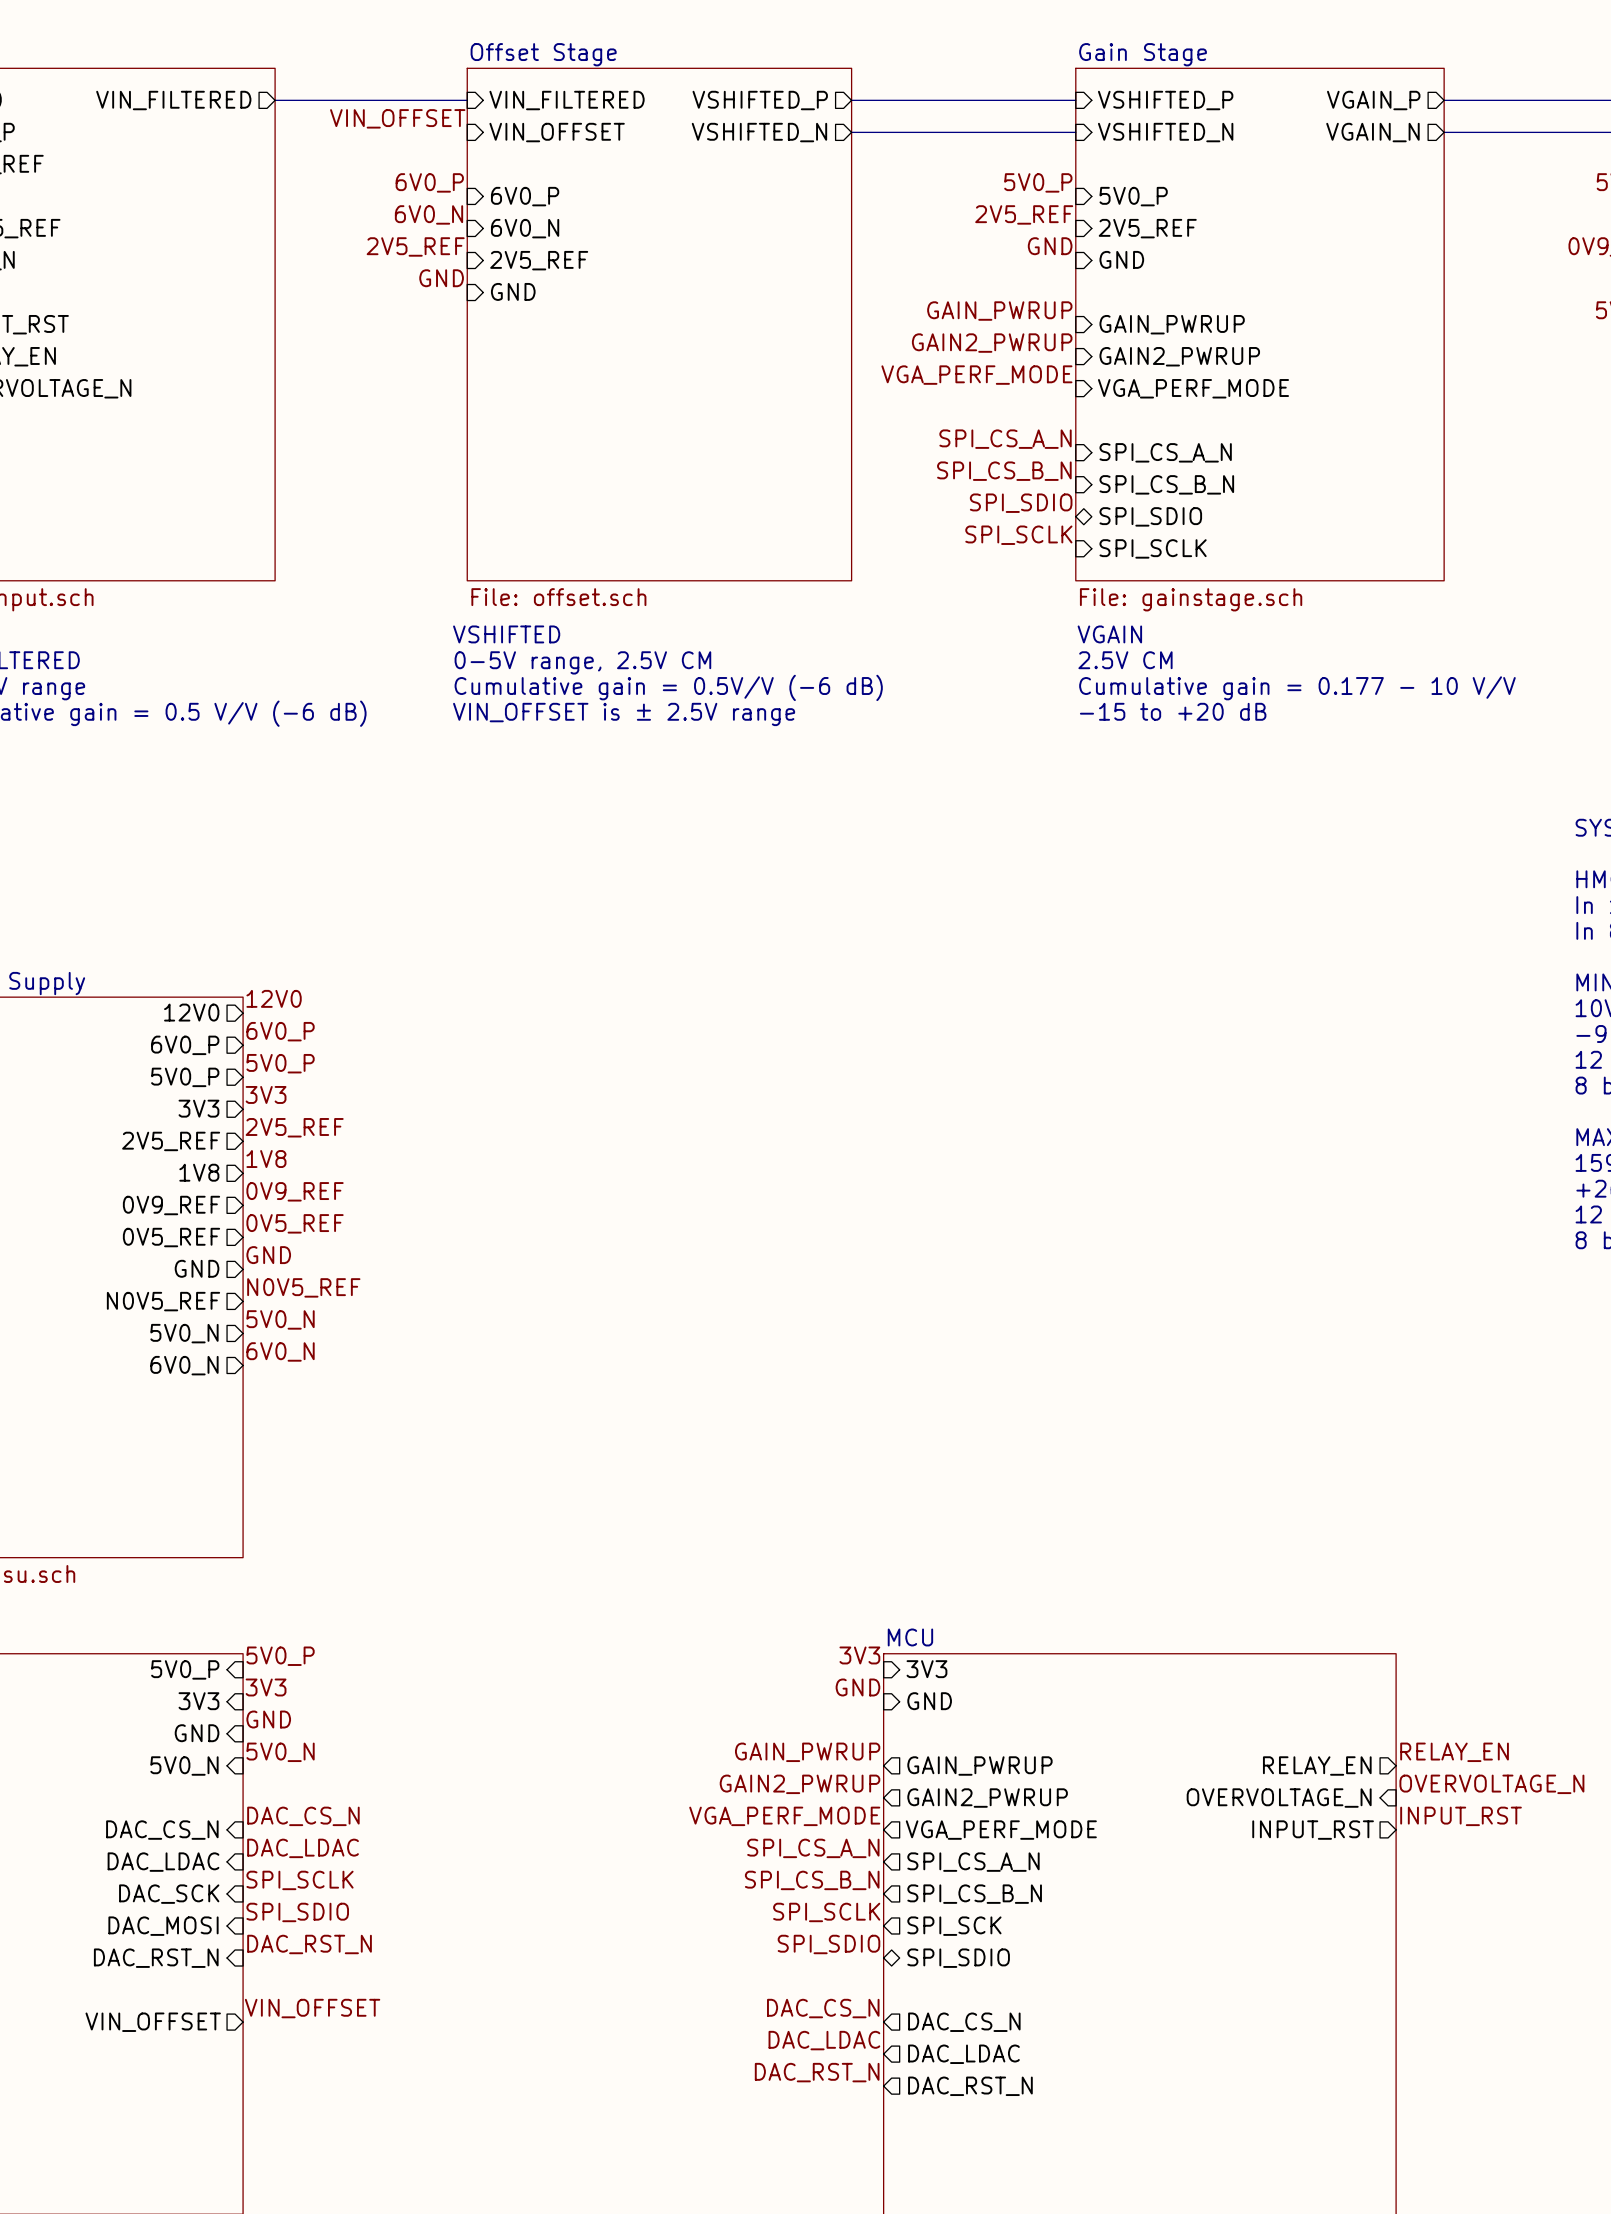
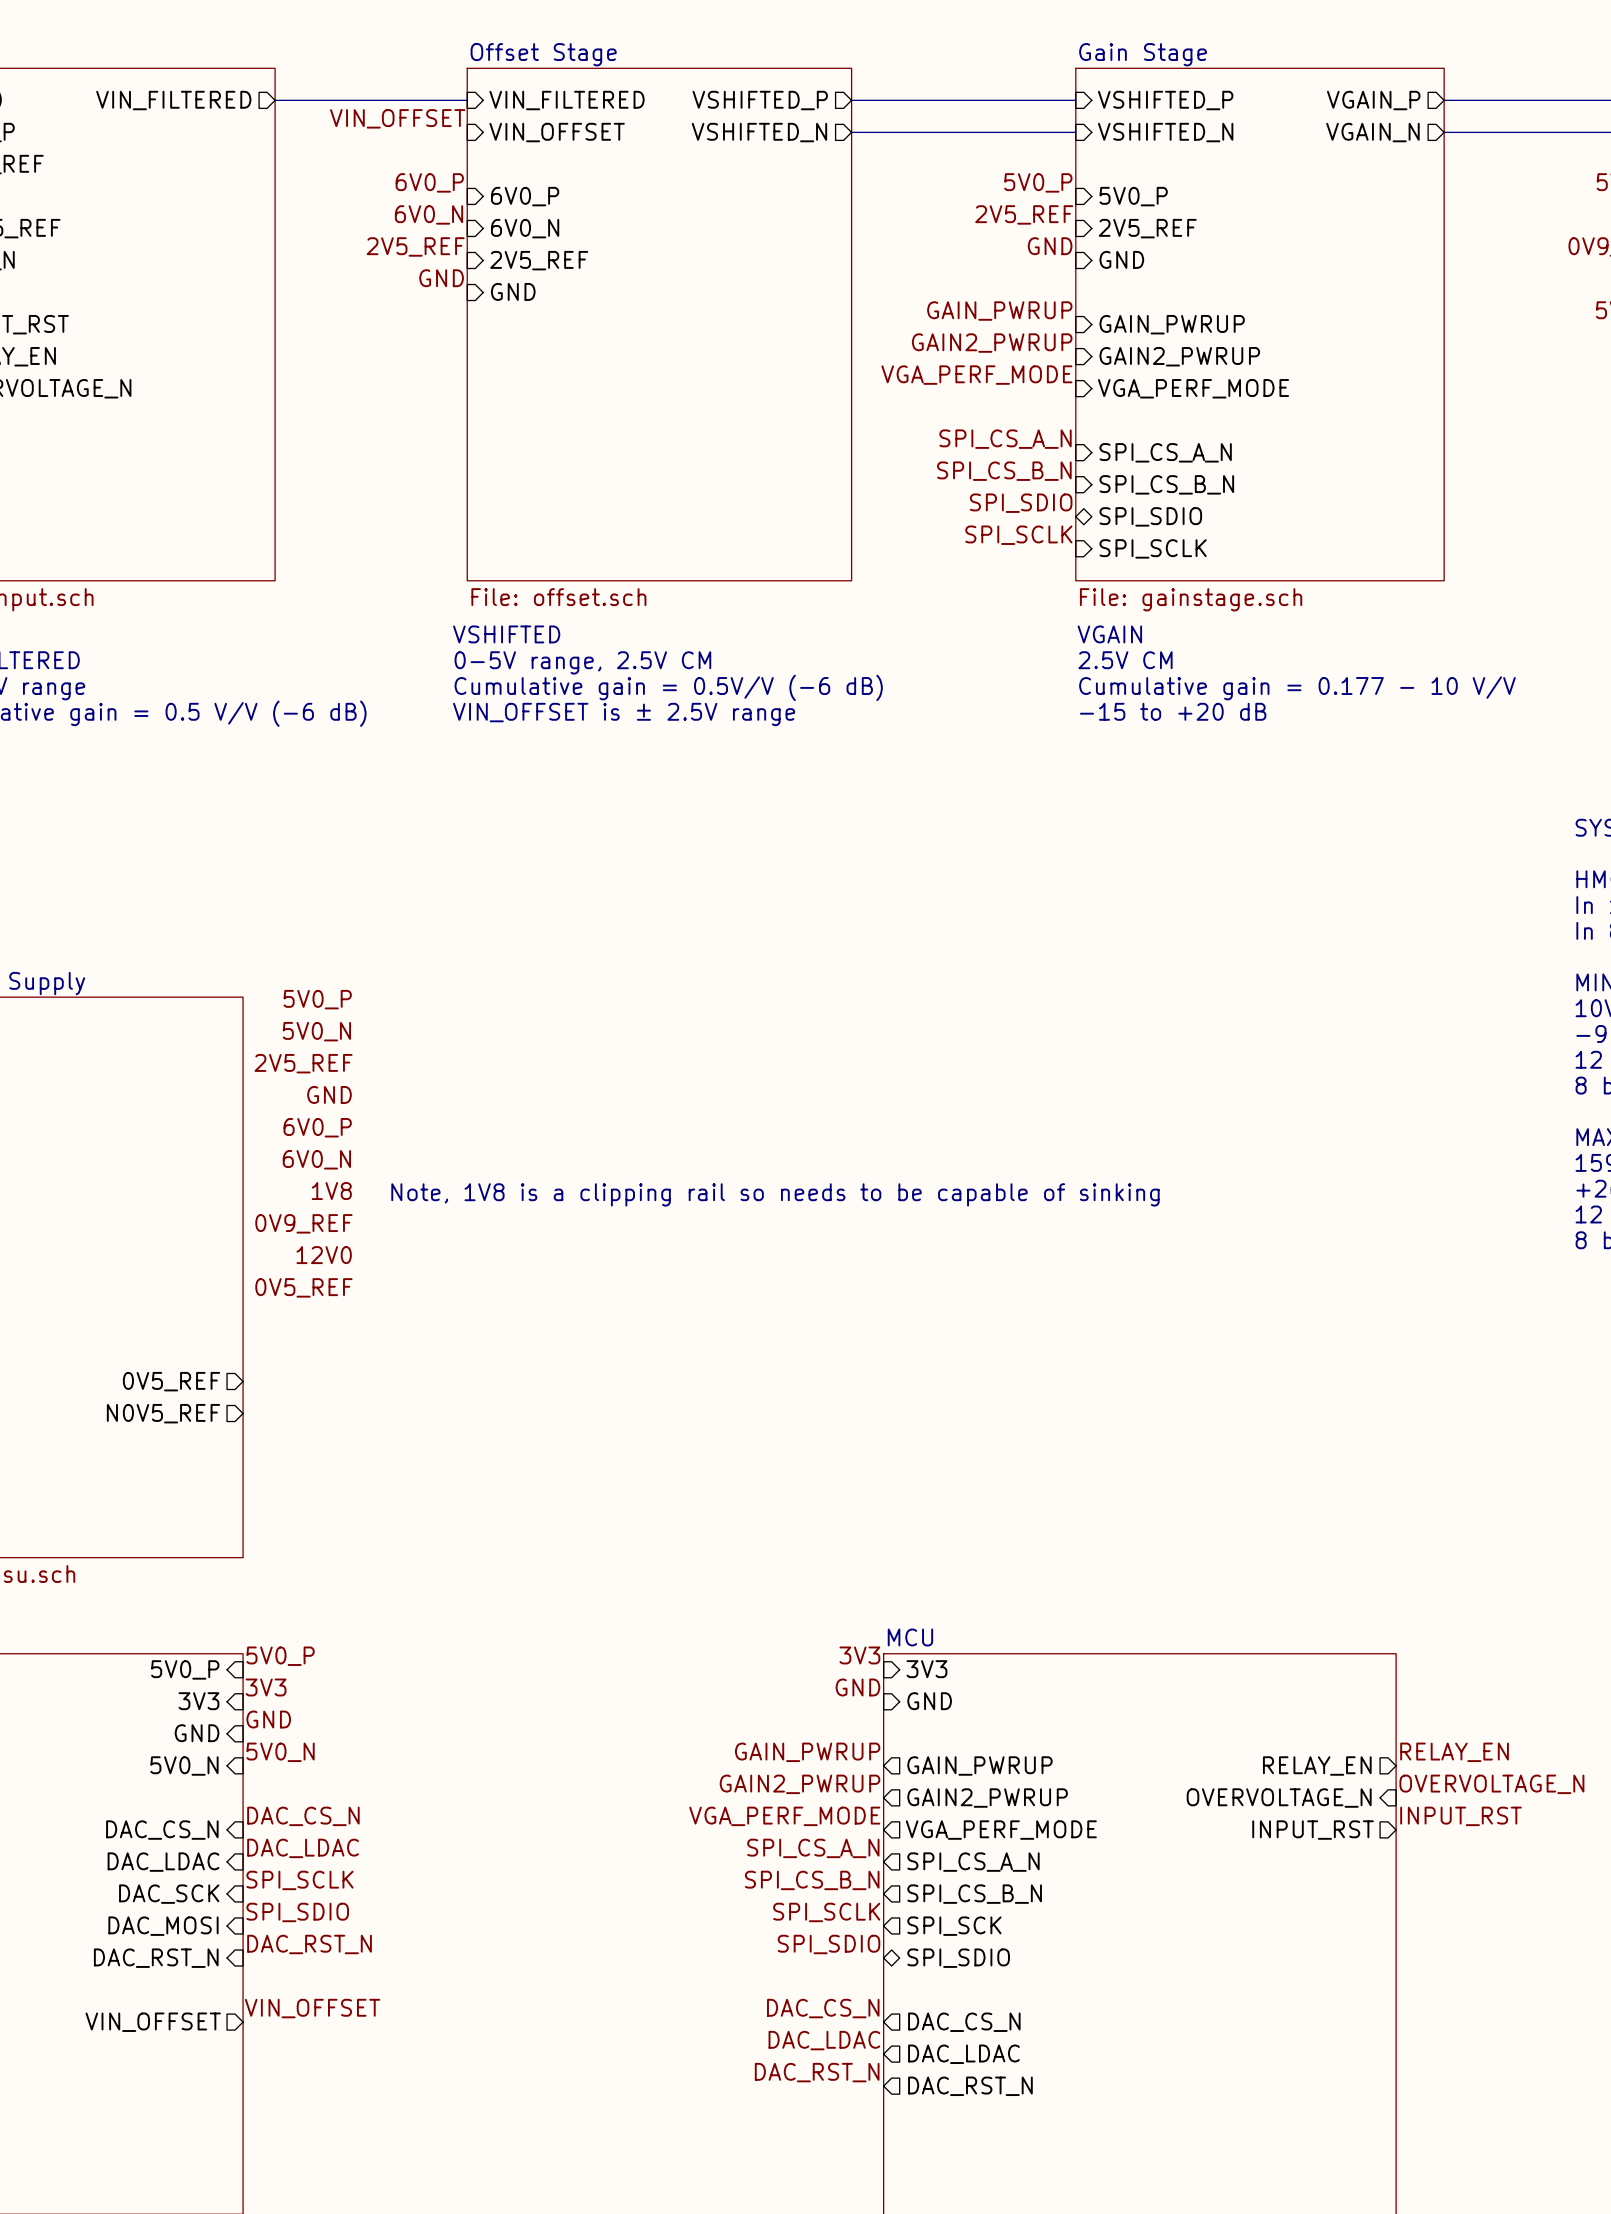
label position: 12V0 (274, 998) -> 12V0 (324, 1255)
sheet pin: 12V0 (191, 1012) -> none
label position: 6V0_P (280, 1031) -> 6V0_P (317, 1127)
sheet pin: 6V0_P (185, 1045) -> none
label position: 5V0_P (280, 1063) -> 5V0_P (317, 999)
sheet pin: 5V0_P (185, 1077) -> none
label: 3V3 (266, 1094) -> none
sheet pin: 3V3 (198, 1108) -> none
label position: 2V5_REF (294, 1127) -> 2V5_REF (303, 1063)
sheet pin: 2V5_REF (171, 1141) -> none
label position: 1V8 (266, 1159) -> 1V8 (331, 1191)
sheet pin: 1V8 (199, 1172) -> none
label position: 0V9_REF (295, 1191) -> 0V9_REF (303, 1223)
text: none -> Note, 1V8 is a clipping rail so needs to be capable of sinking (775, 1194)
sheet pin: 0V9_REF (171, 1205) -> none
label position: 0V5_REF (295, 1223) -> 0V5_REF (303, 1287)
sheet pin position: 0V5_REF (171, 1237) -> 0V5_REF (171, 1381)
label position: GND (268, 1255) -> GND (329, 1094)
sheet pin: GND (197, 1268) -> none
label: N0V5_REF (303, 1287) -> none
sheet pin position: N0V5_REF (163, 1301) -> N0V5_REF (163, 1413)
label position: 5V0_N (280, 1319) -> 5V0_N (316, 1031)
sheet pin: 5V0_N (184, 1333) -> none
label position: 6V0_N (280, 1351) -> 6V0_N (316, 1159)
sheet pin: 6V0_N (184, 1365) -> none

